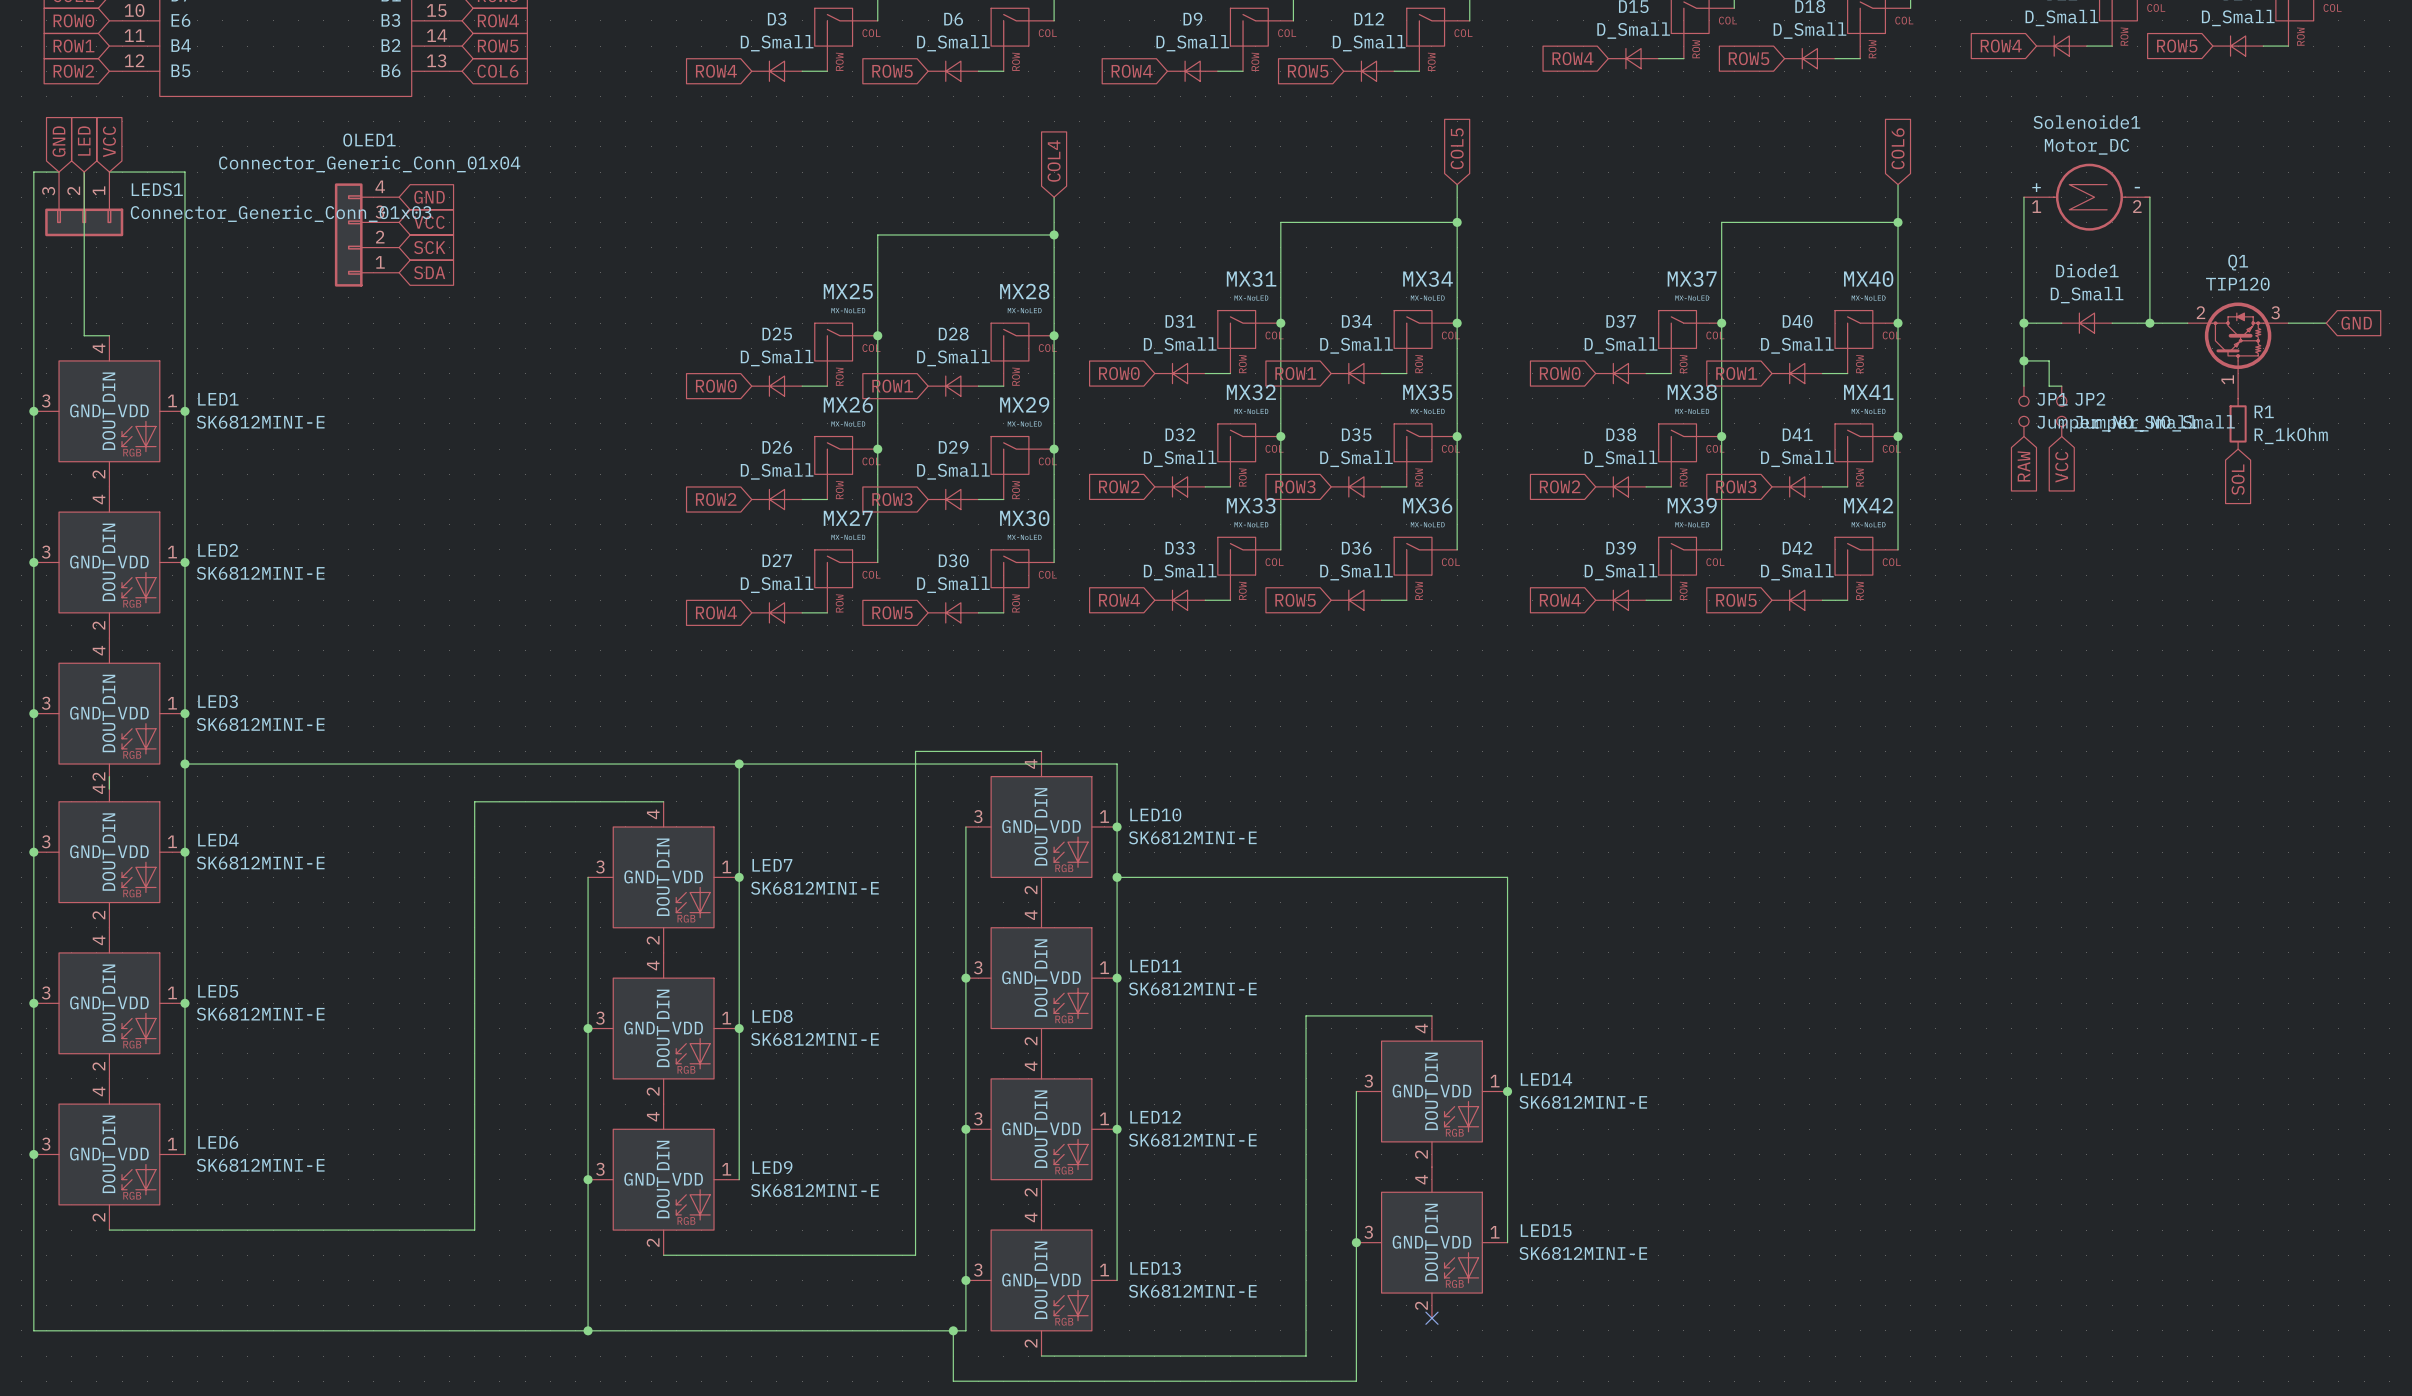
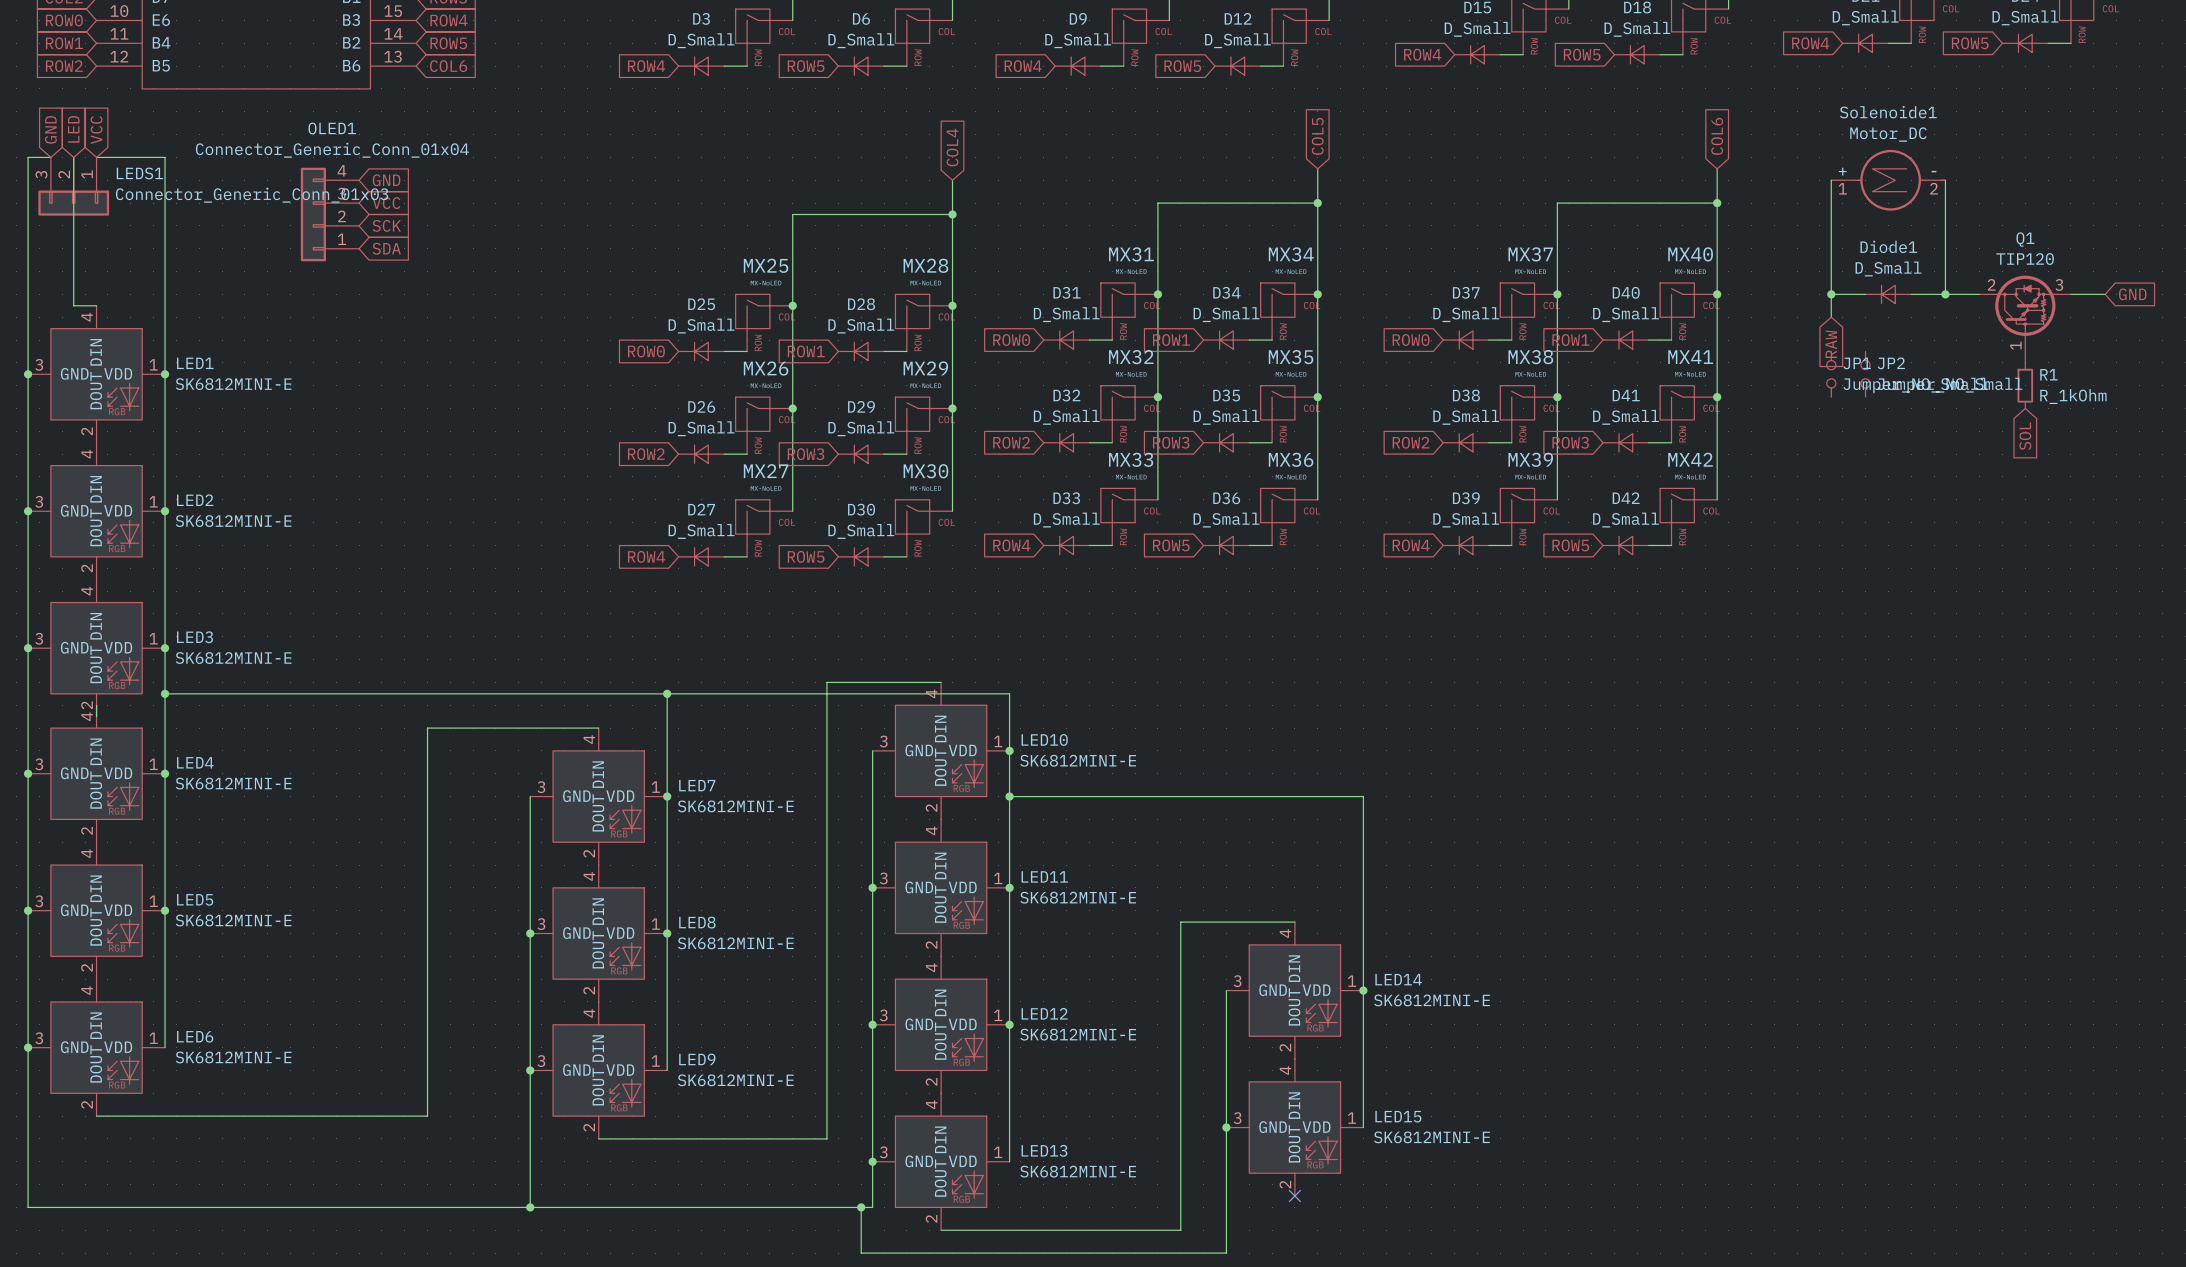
wire: (2023, 348) (2023, 386) -> none
wire: (2023, 360) (2049, 360) (2049, 386) (2061, 386) -> none
junction: (2023, 360) -> none
global label position: RAW (2023, 466) -> RAW (1831, 344)
global label: VCC (2061, 467) -> none

